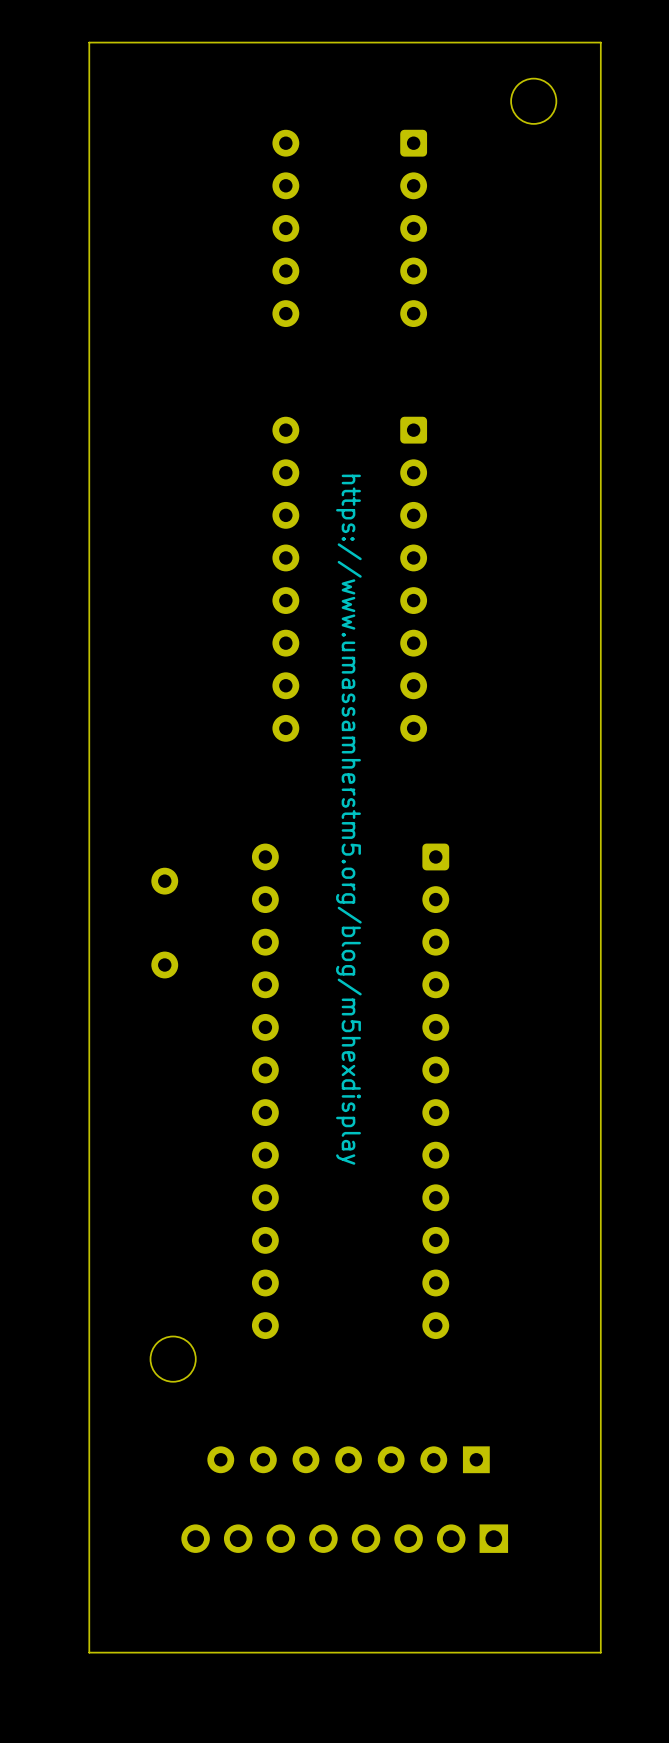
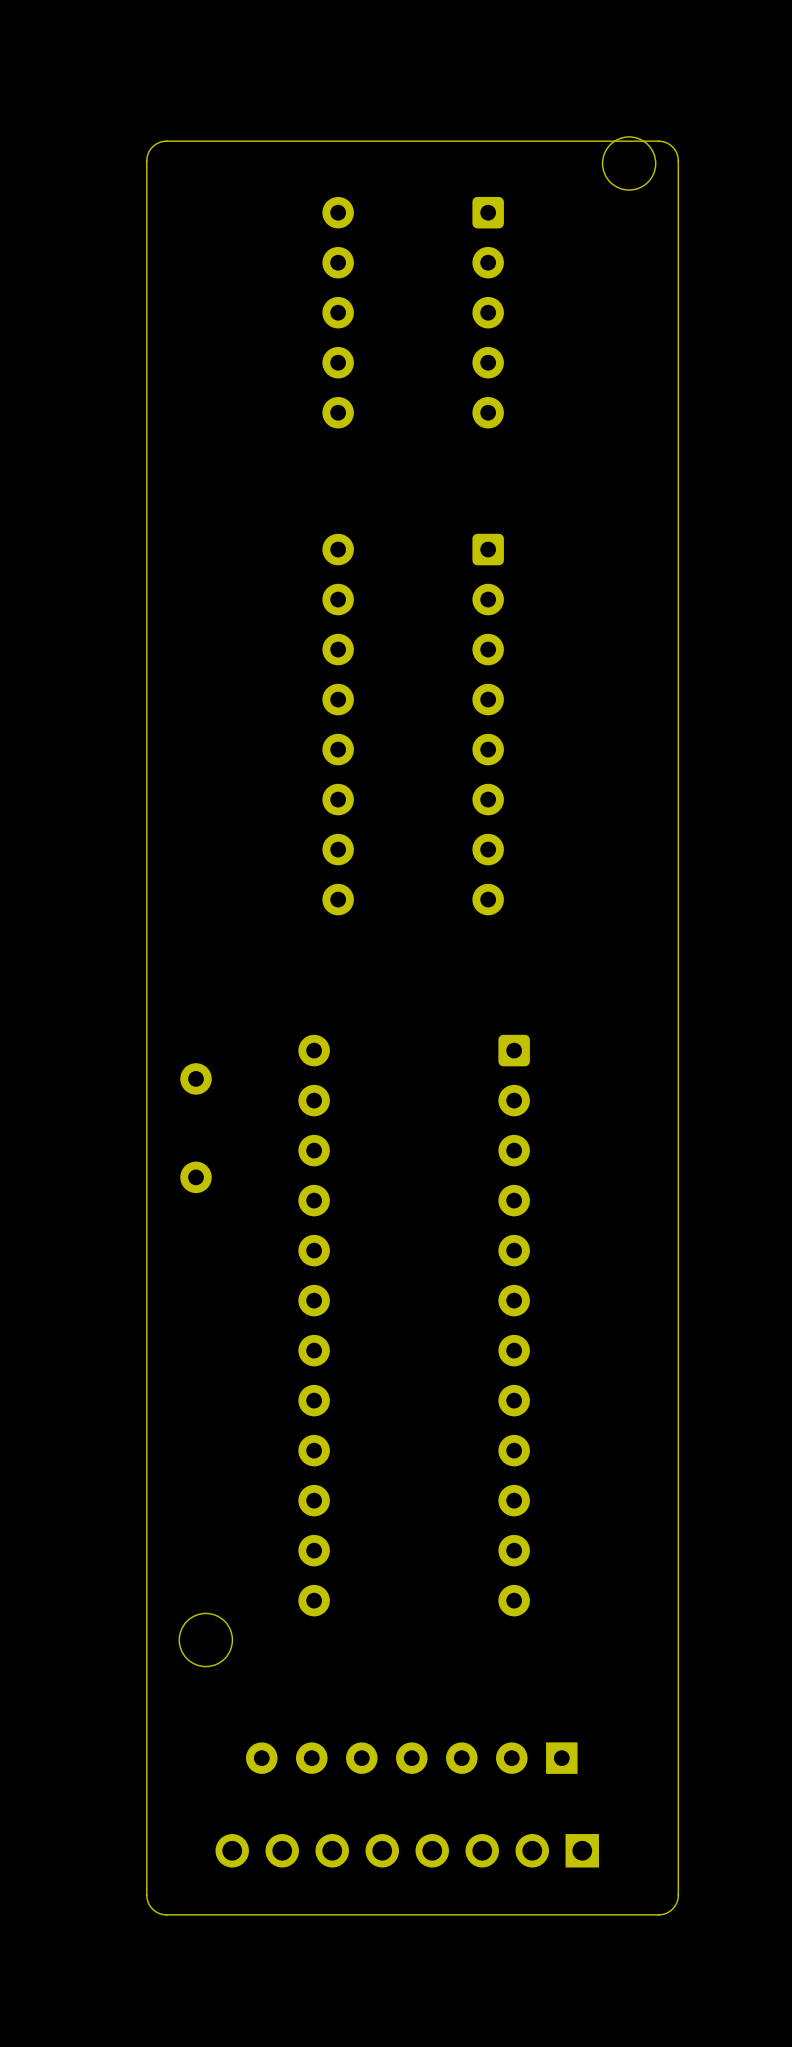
board edge: (600, 42) (89, 42) (89, 1652) (600, 1652) (600, 42) -> (658, 141) (672, 146) (678, 160) (677, 1900) (670, 1910) (658, 1914) (162, 1914) (151, 1907) (146, 1895) (147, 156) (154, 145) (166, 141) (658, 141)
text: https://www.umassamherstm5.org/blog/m5hexdisplay (348, 819) -> none

